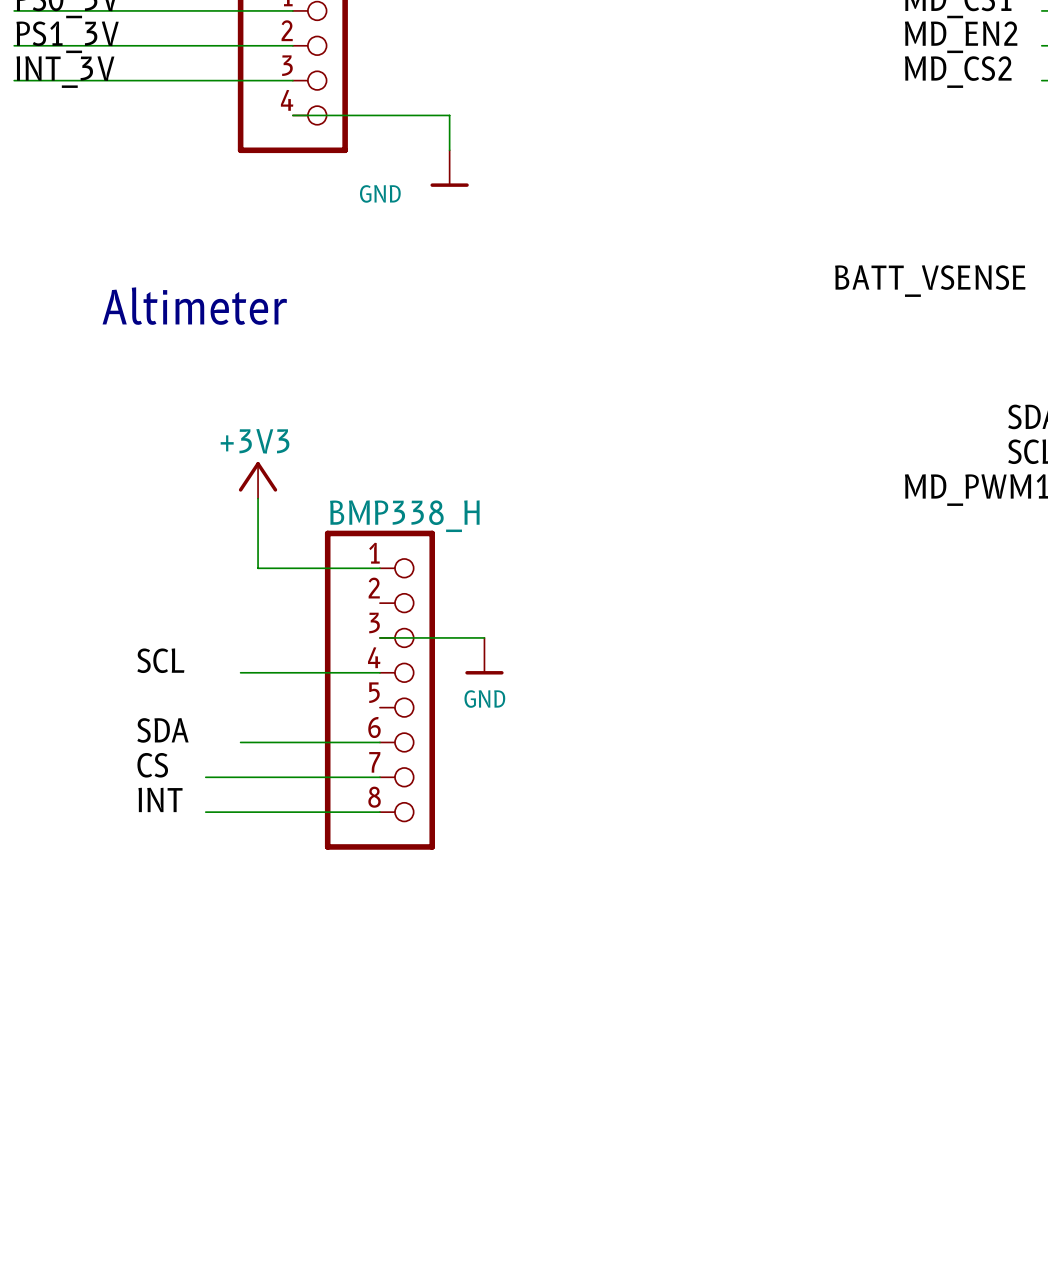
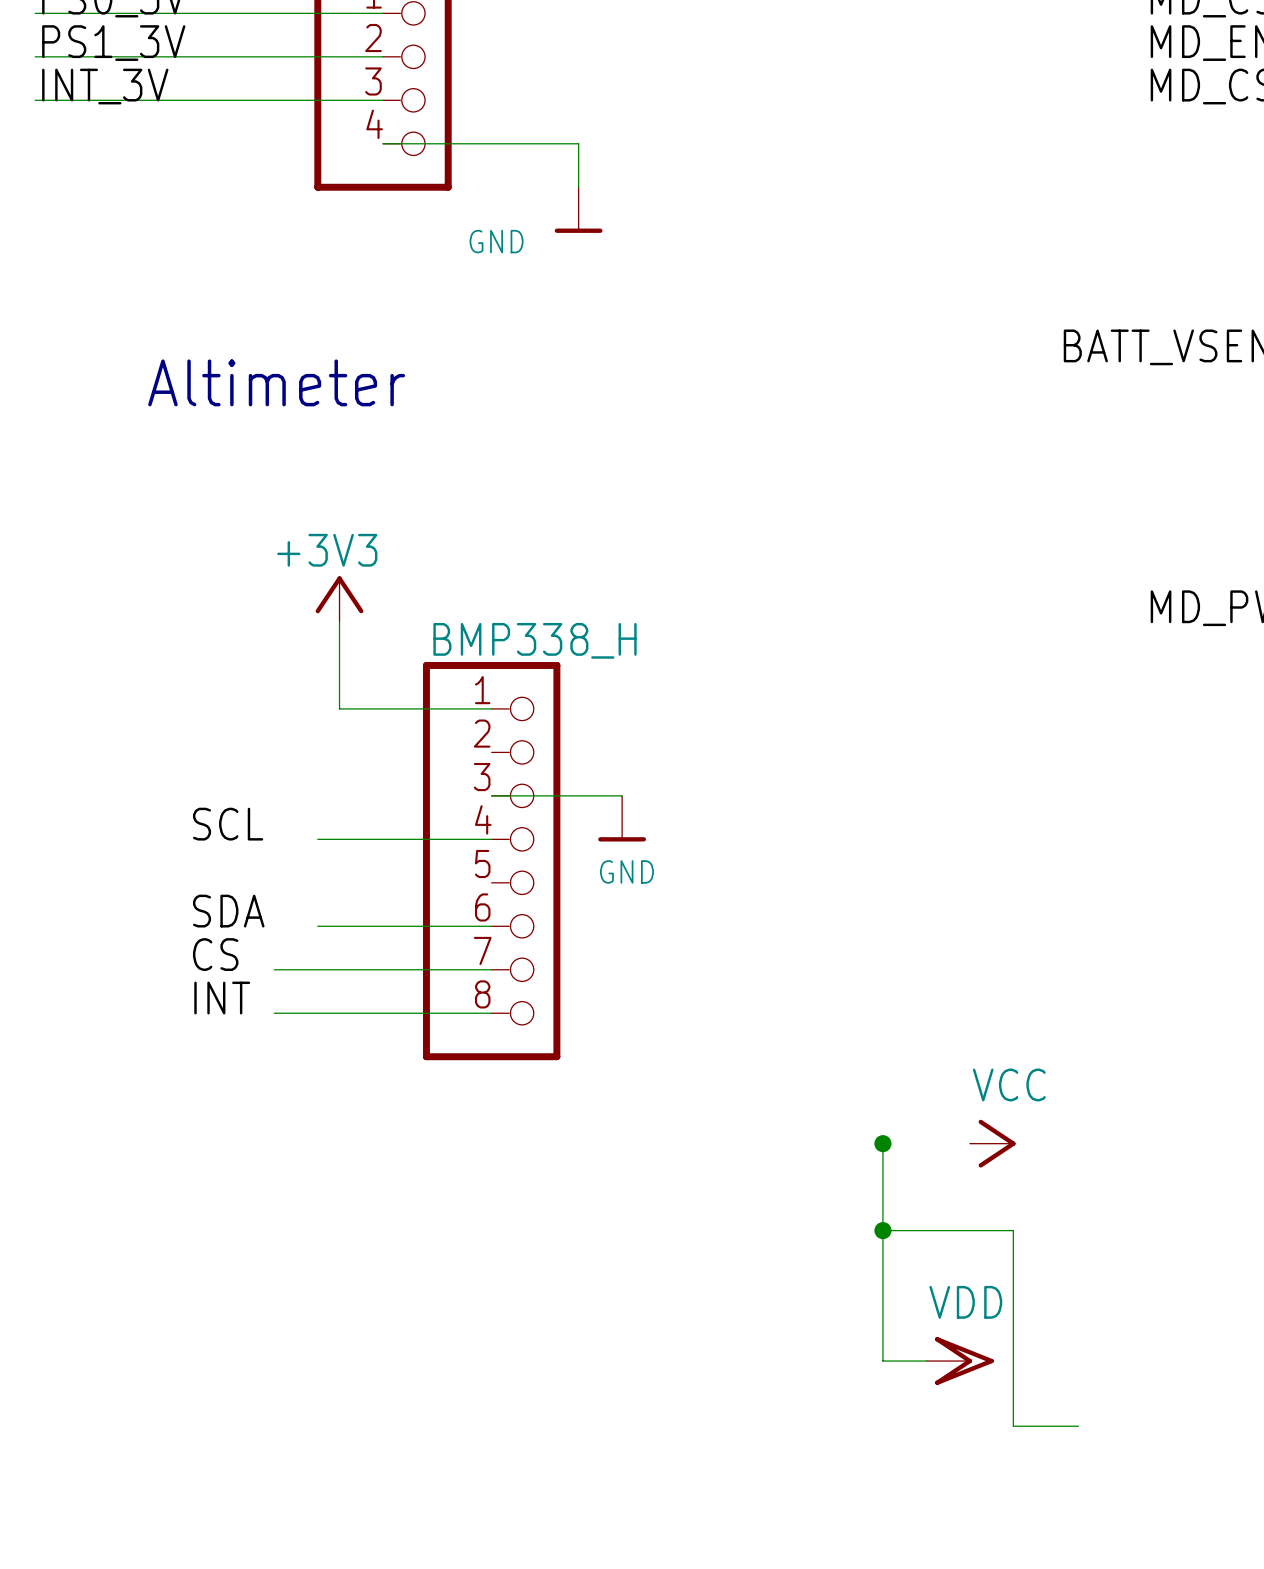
wire: none -> (882, 1143) (882, 1361) (926, 1361)
junction: none -> (882, 1143)
power symbol: none -> VCC (992, 1143)
wire: none -> (882, 1230) (1013, 1230) (1013, 1426) (1078, 1426)
junction: none -> (882, 1230)
power symbol: none -> VDD (960, 1361)

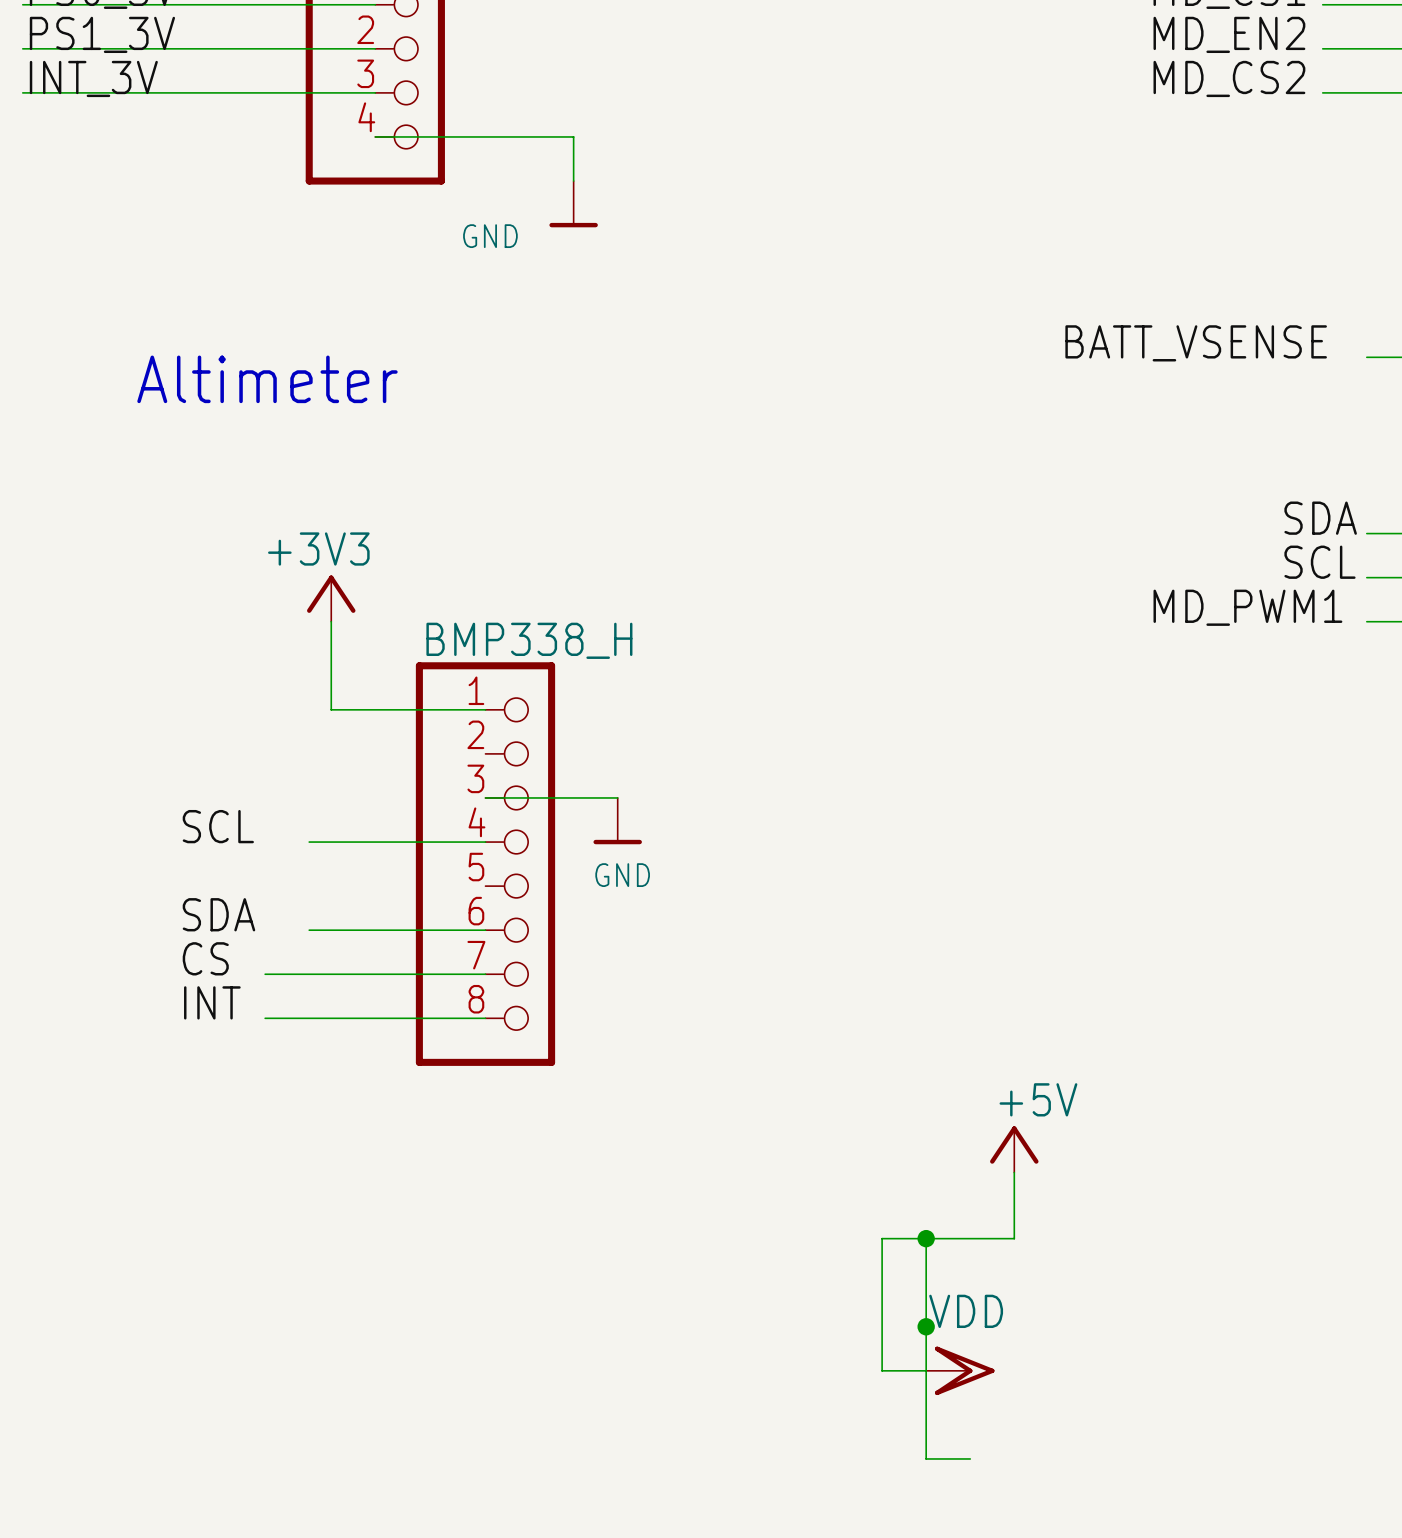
power symbol: none -> +5V (1014, 1149)
wire: (882, 1143) (882, 1230) -> none
junction: (882, 1143) -> none
power symbol: VCC (992, 1143) -> none
junction position: (882, 1230) -> (926, 1238)
wire: none -> (926, 1238) (926, 1458) (970, 1458)
wire: (1013, 1230) (1013, 1426) (1078, 1426) -> (1014, 1238) (1014, 1172)
junction: none -> (926, 1326)

